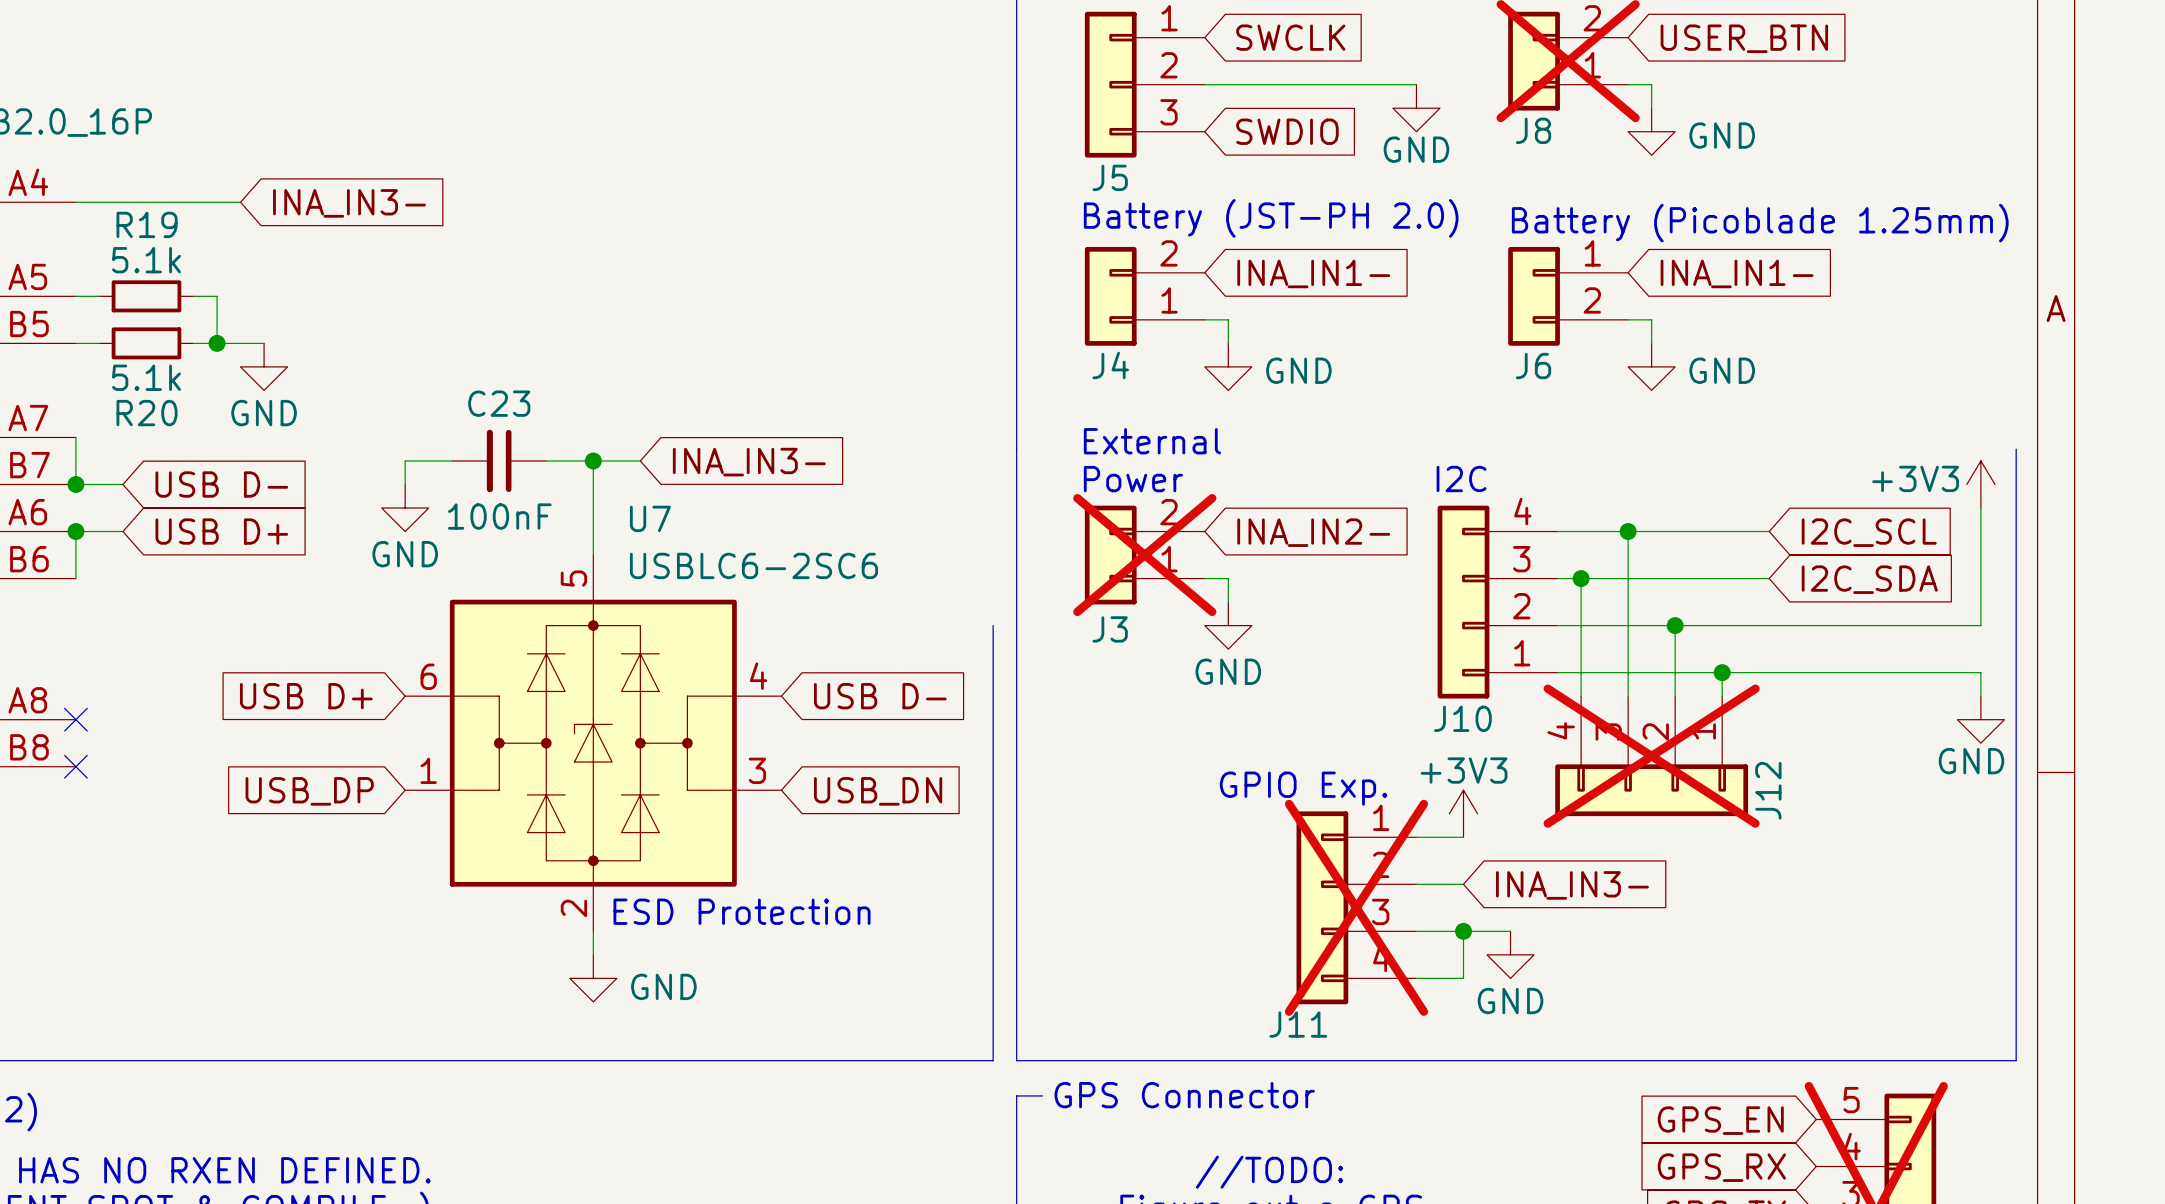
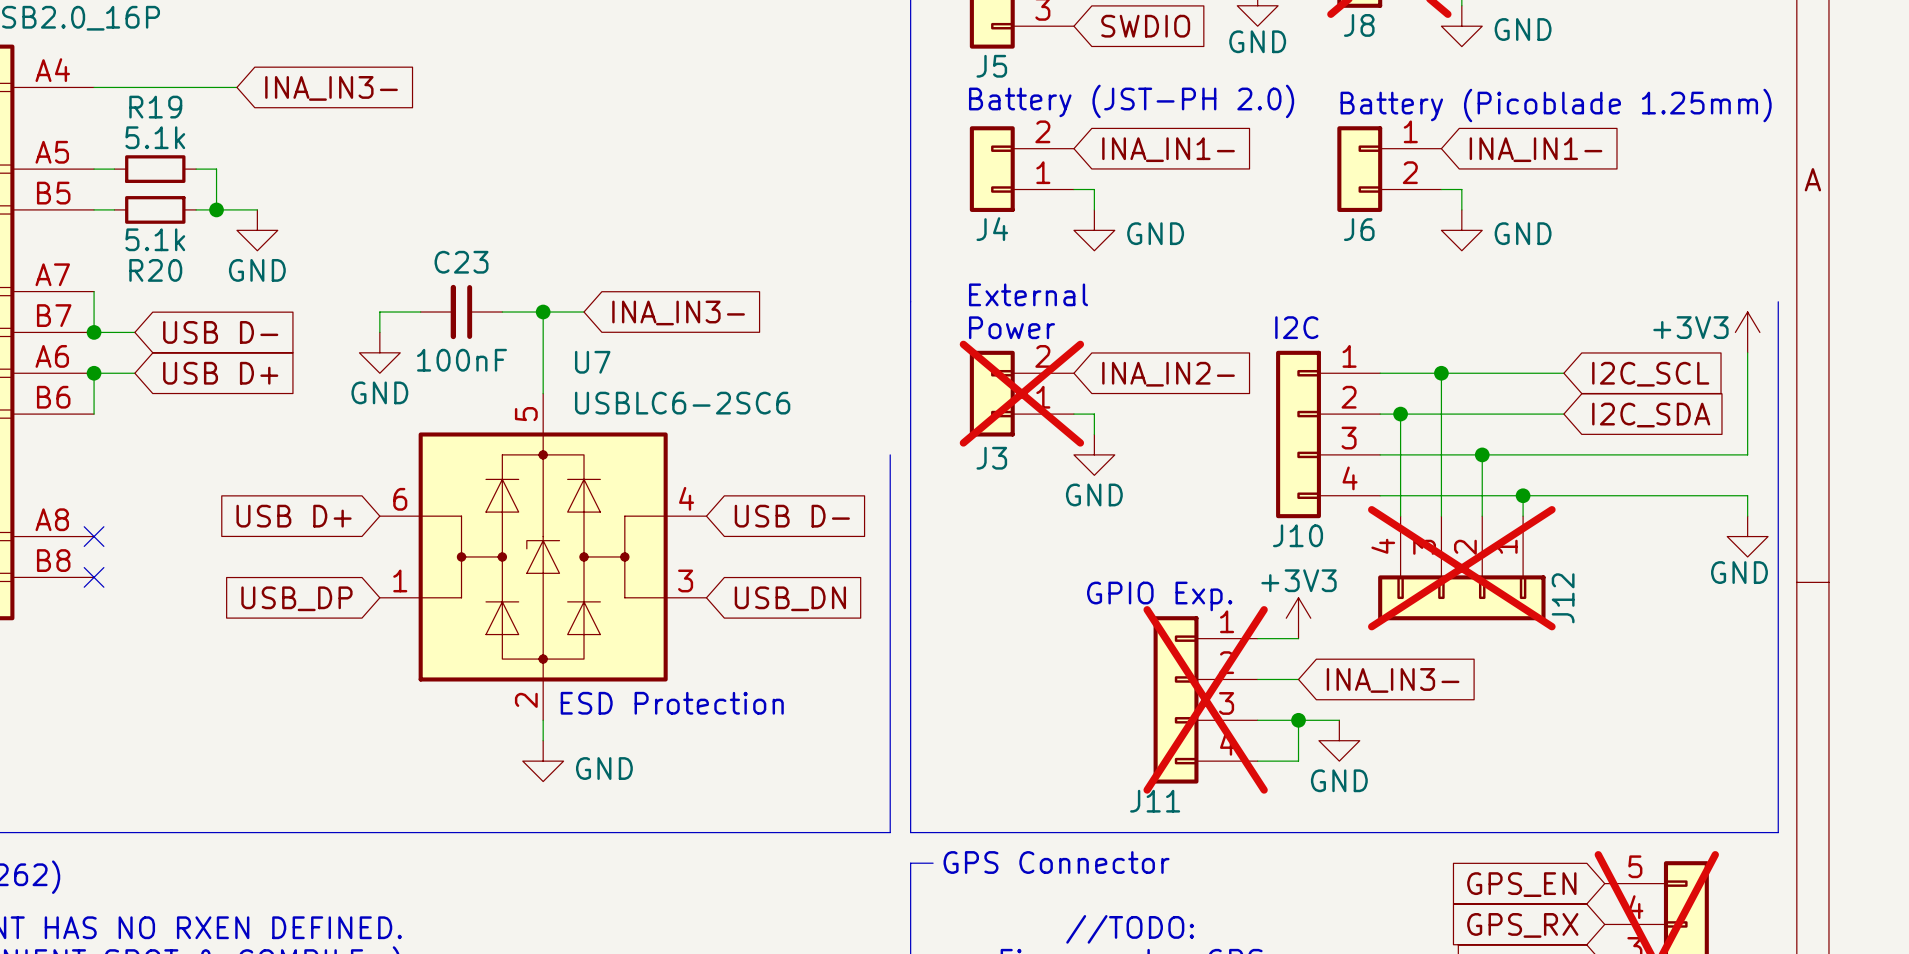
J10 flip: as is (1463, 602) -> up-down (1298, 434)

